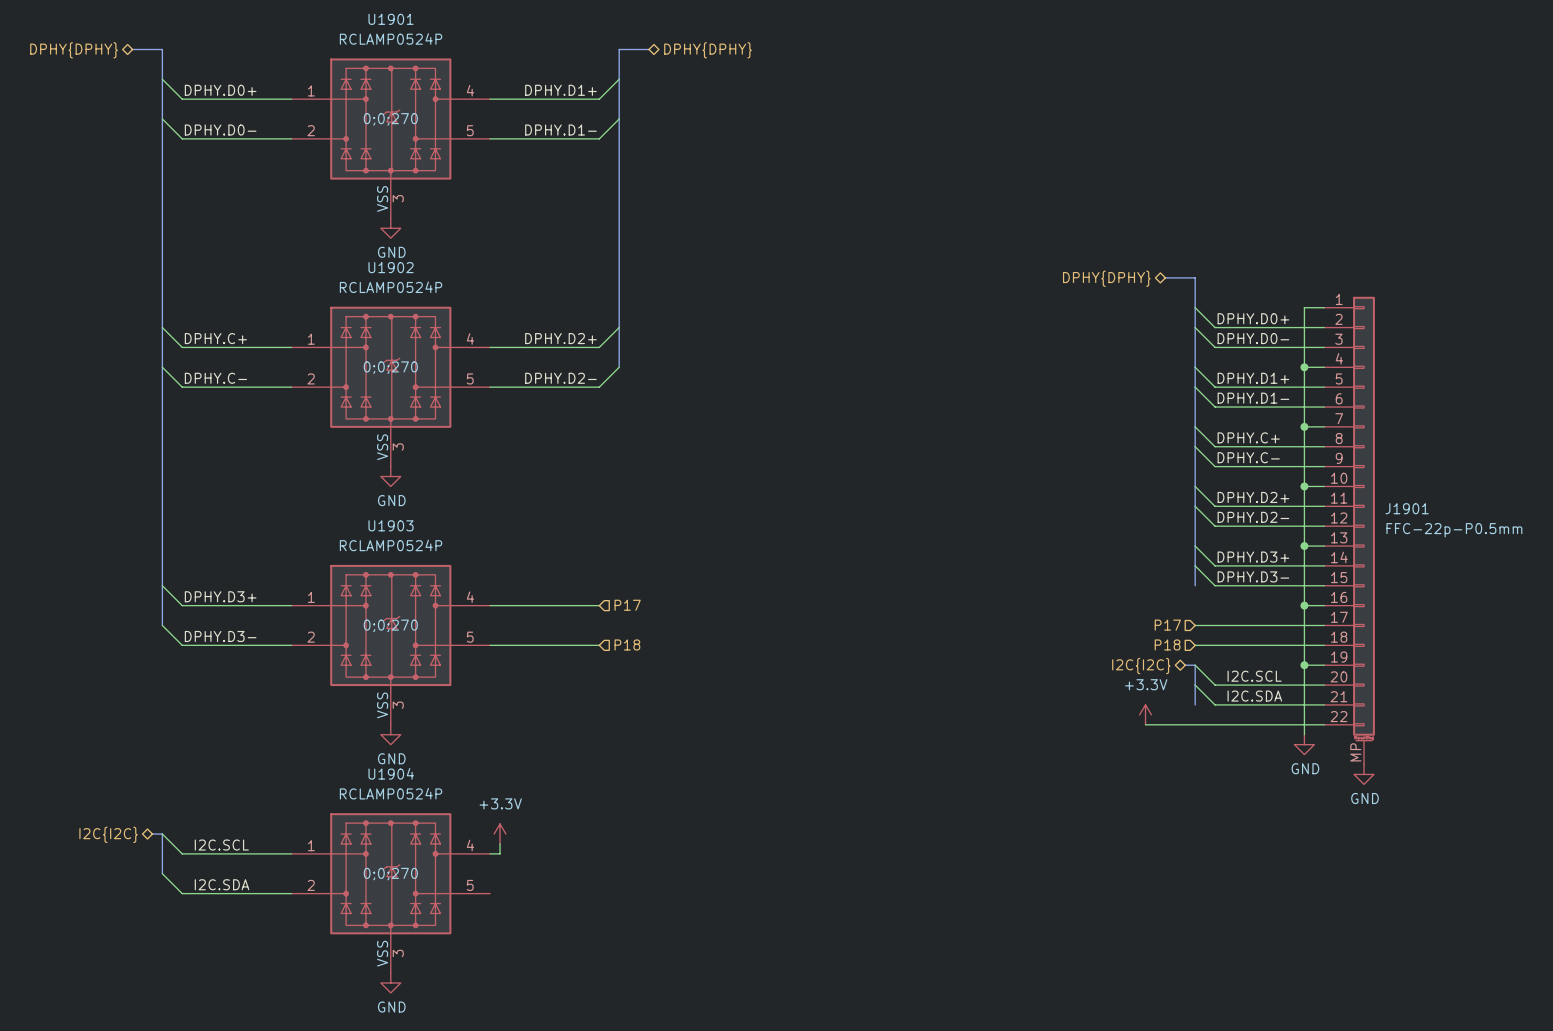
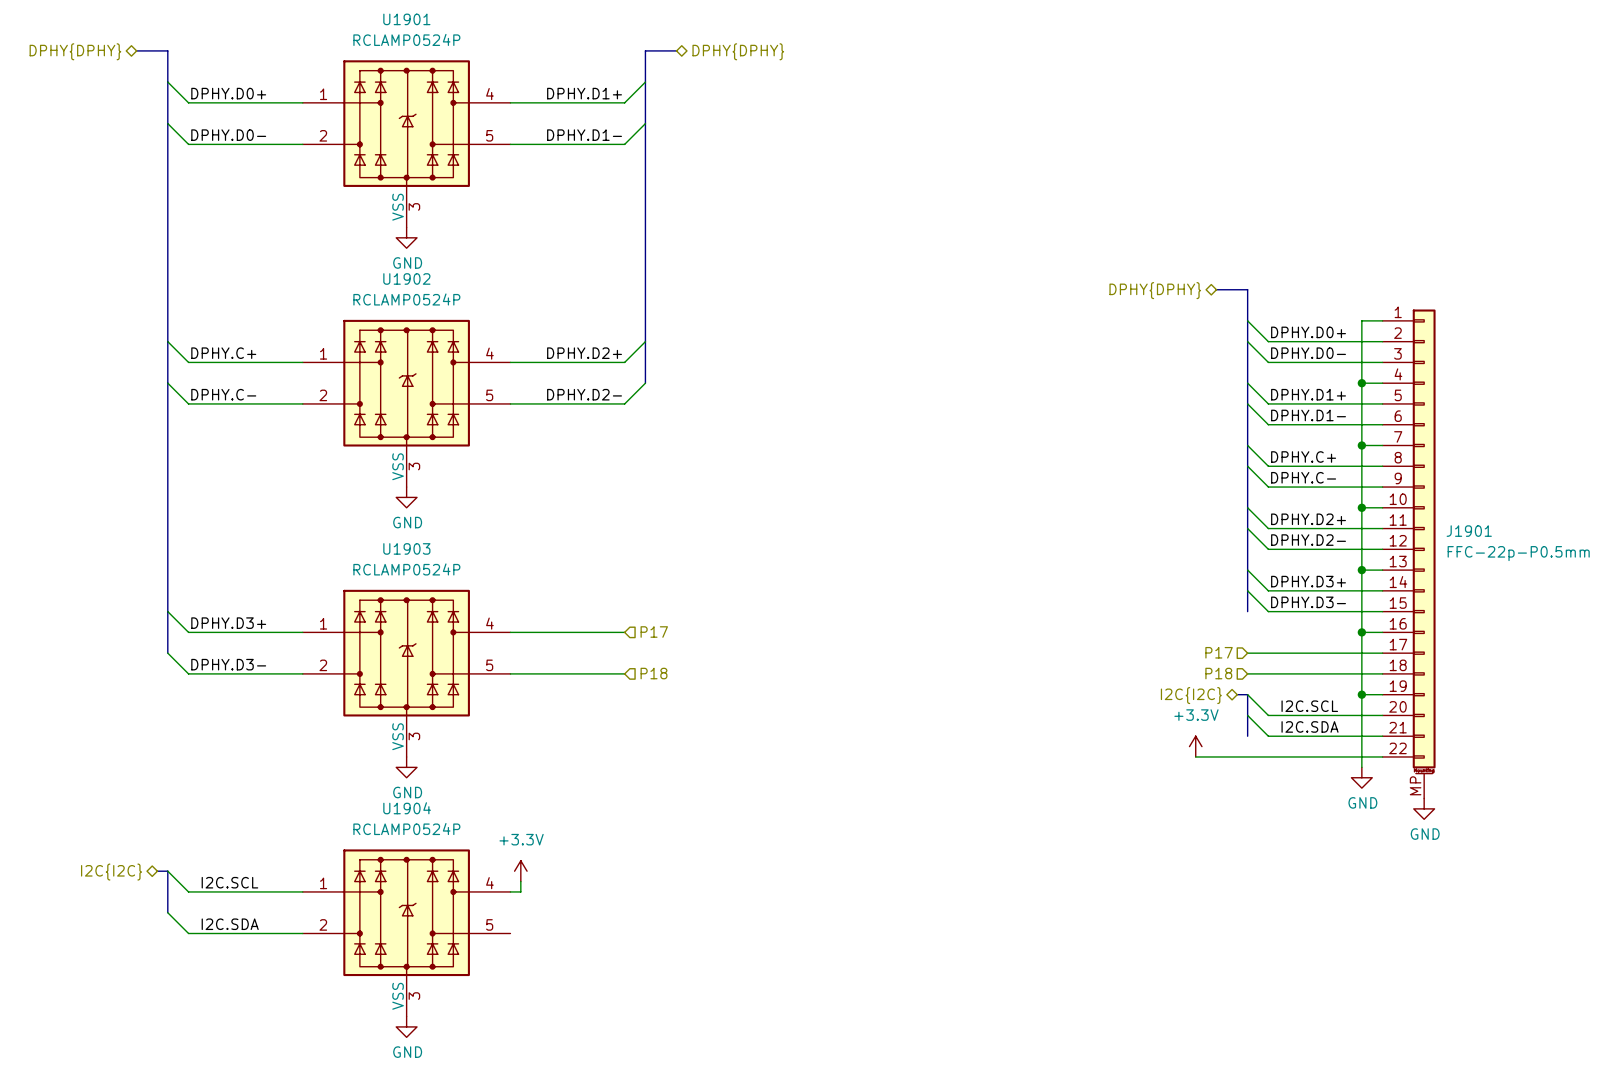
U1901 text: 0;0;270 (390, 119) -> none
U1902 text: 0;0;270 (390, 367) -> none
U1903 text: 0;0;270 (390, 625) -> none
U1904 text: 0;0;270 (390, 874) -> none

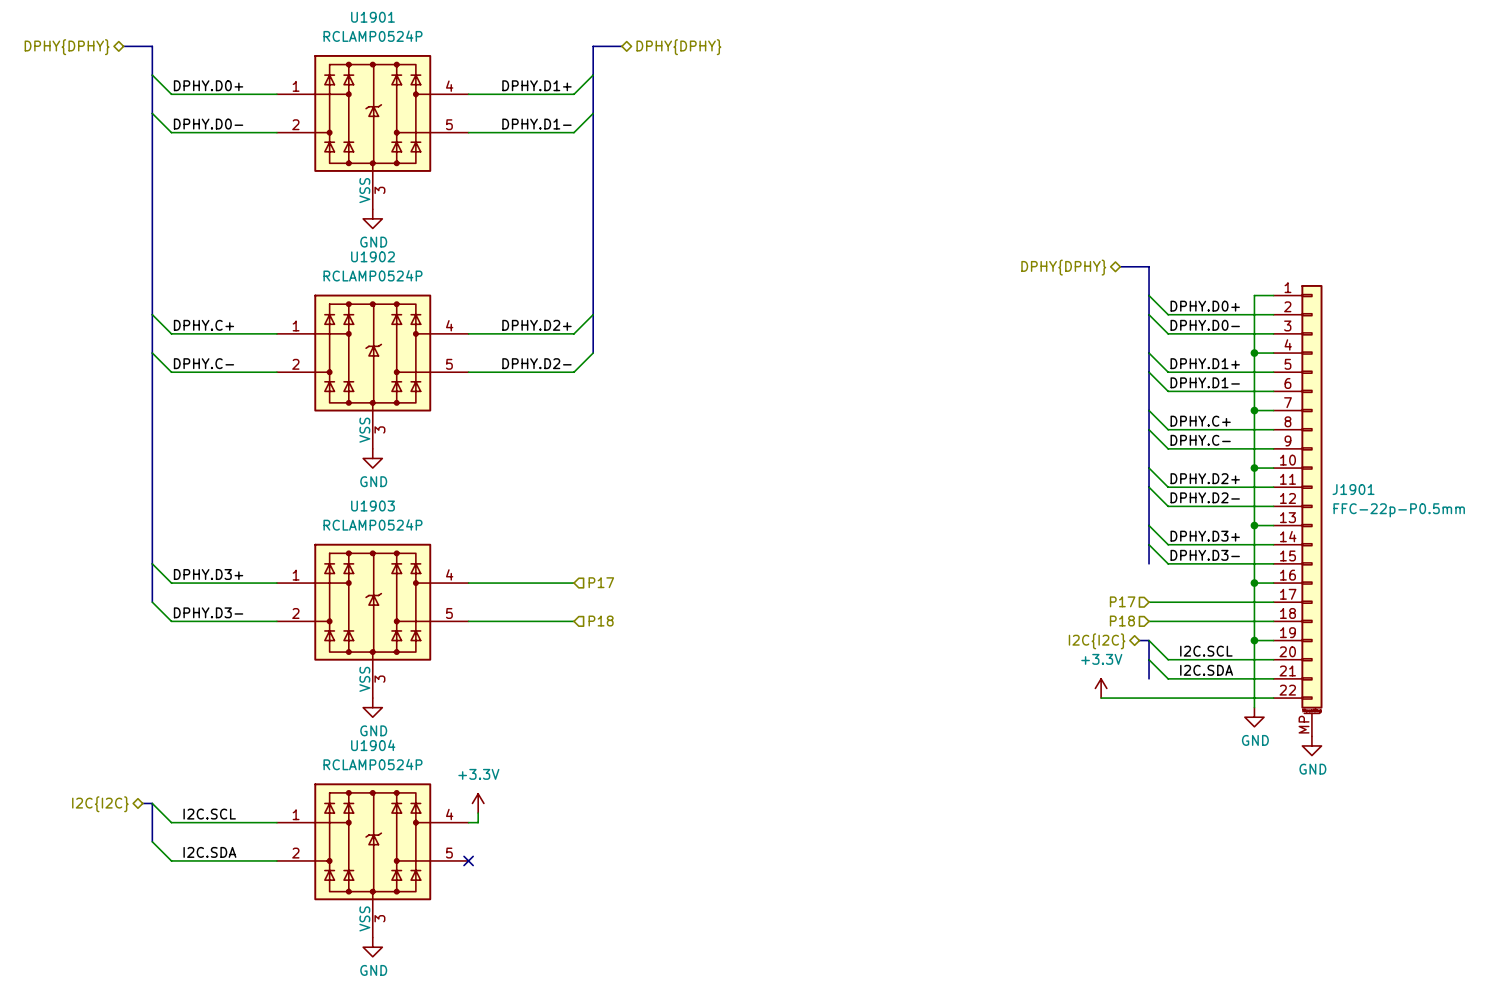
no-connect mark: none -> (468, 860)

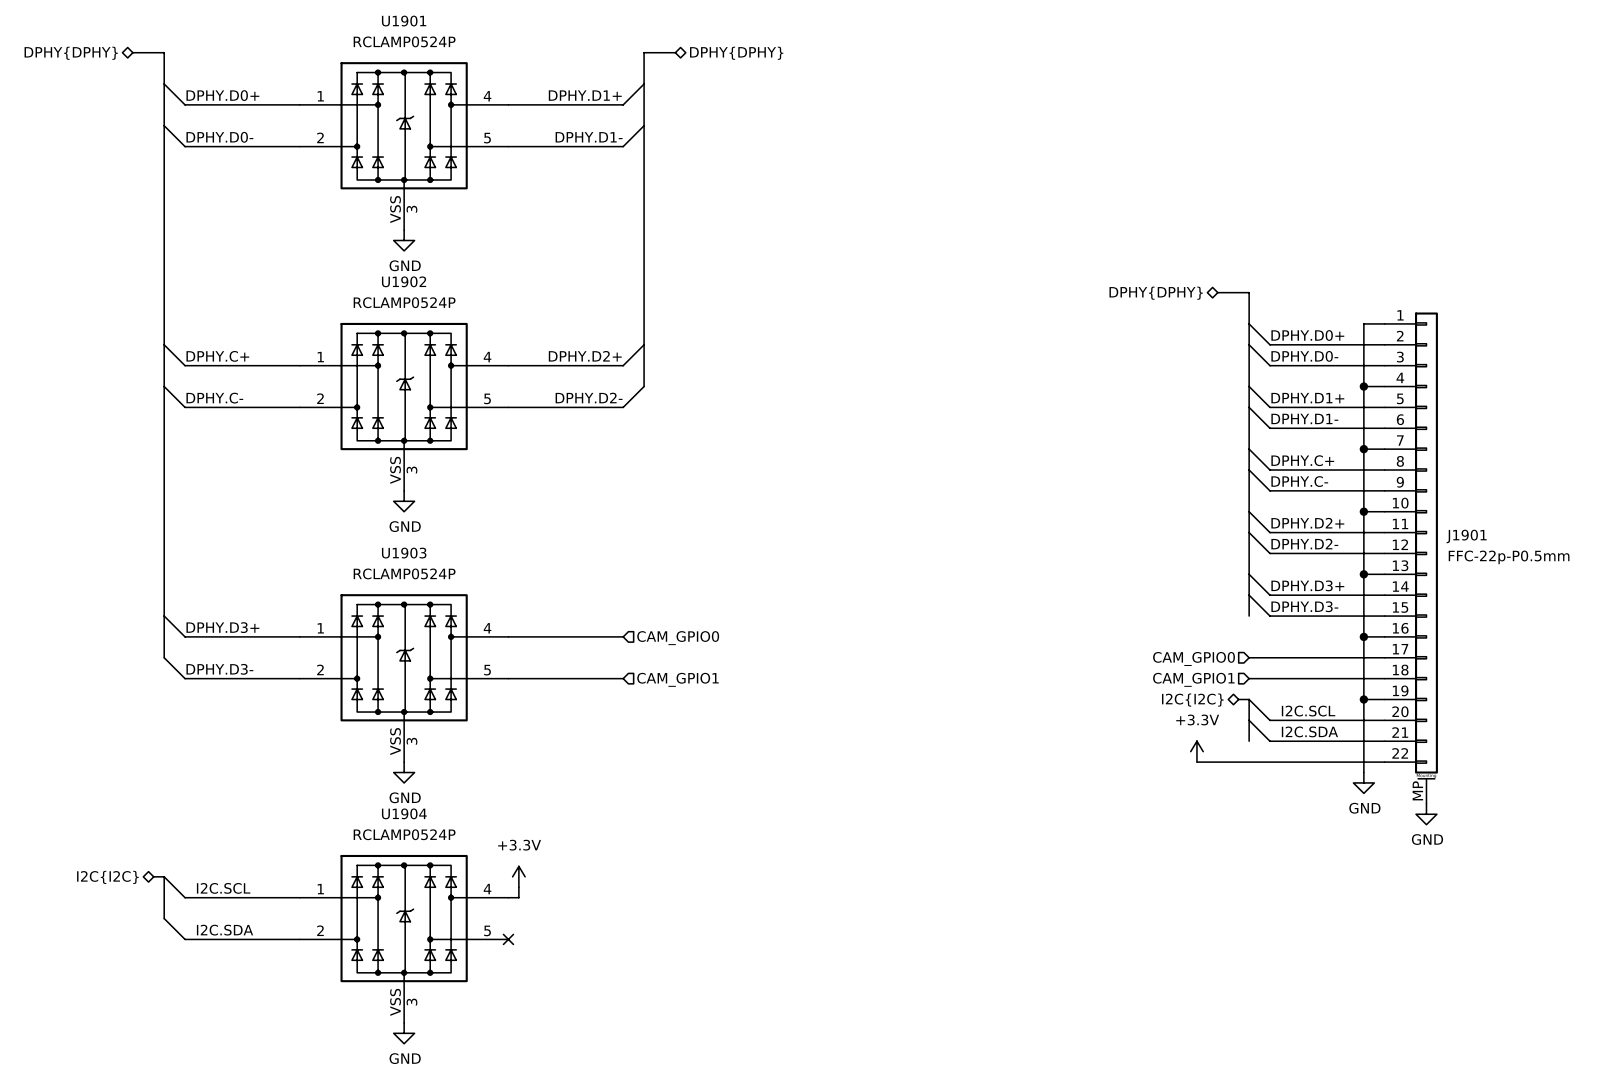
hierarchical label: P17 (601, 582) -> CAM_GPIO0 (678, 638)
hierarchical label: P17 (1122, 601) -> CAM_GPIO0 (1194, 658)
hierarchical label: P18 (601, 621) -> CAM_GPIO1 (677, 679)
hierarchical label: P18 (1122, 621) -> CAM_GPIO1 (1193, 679)

